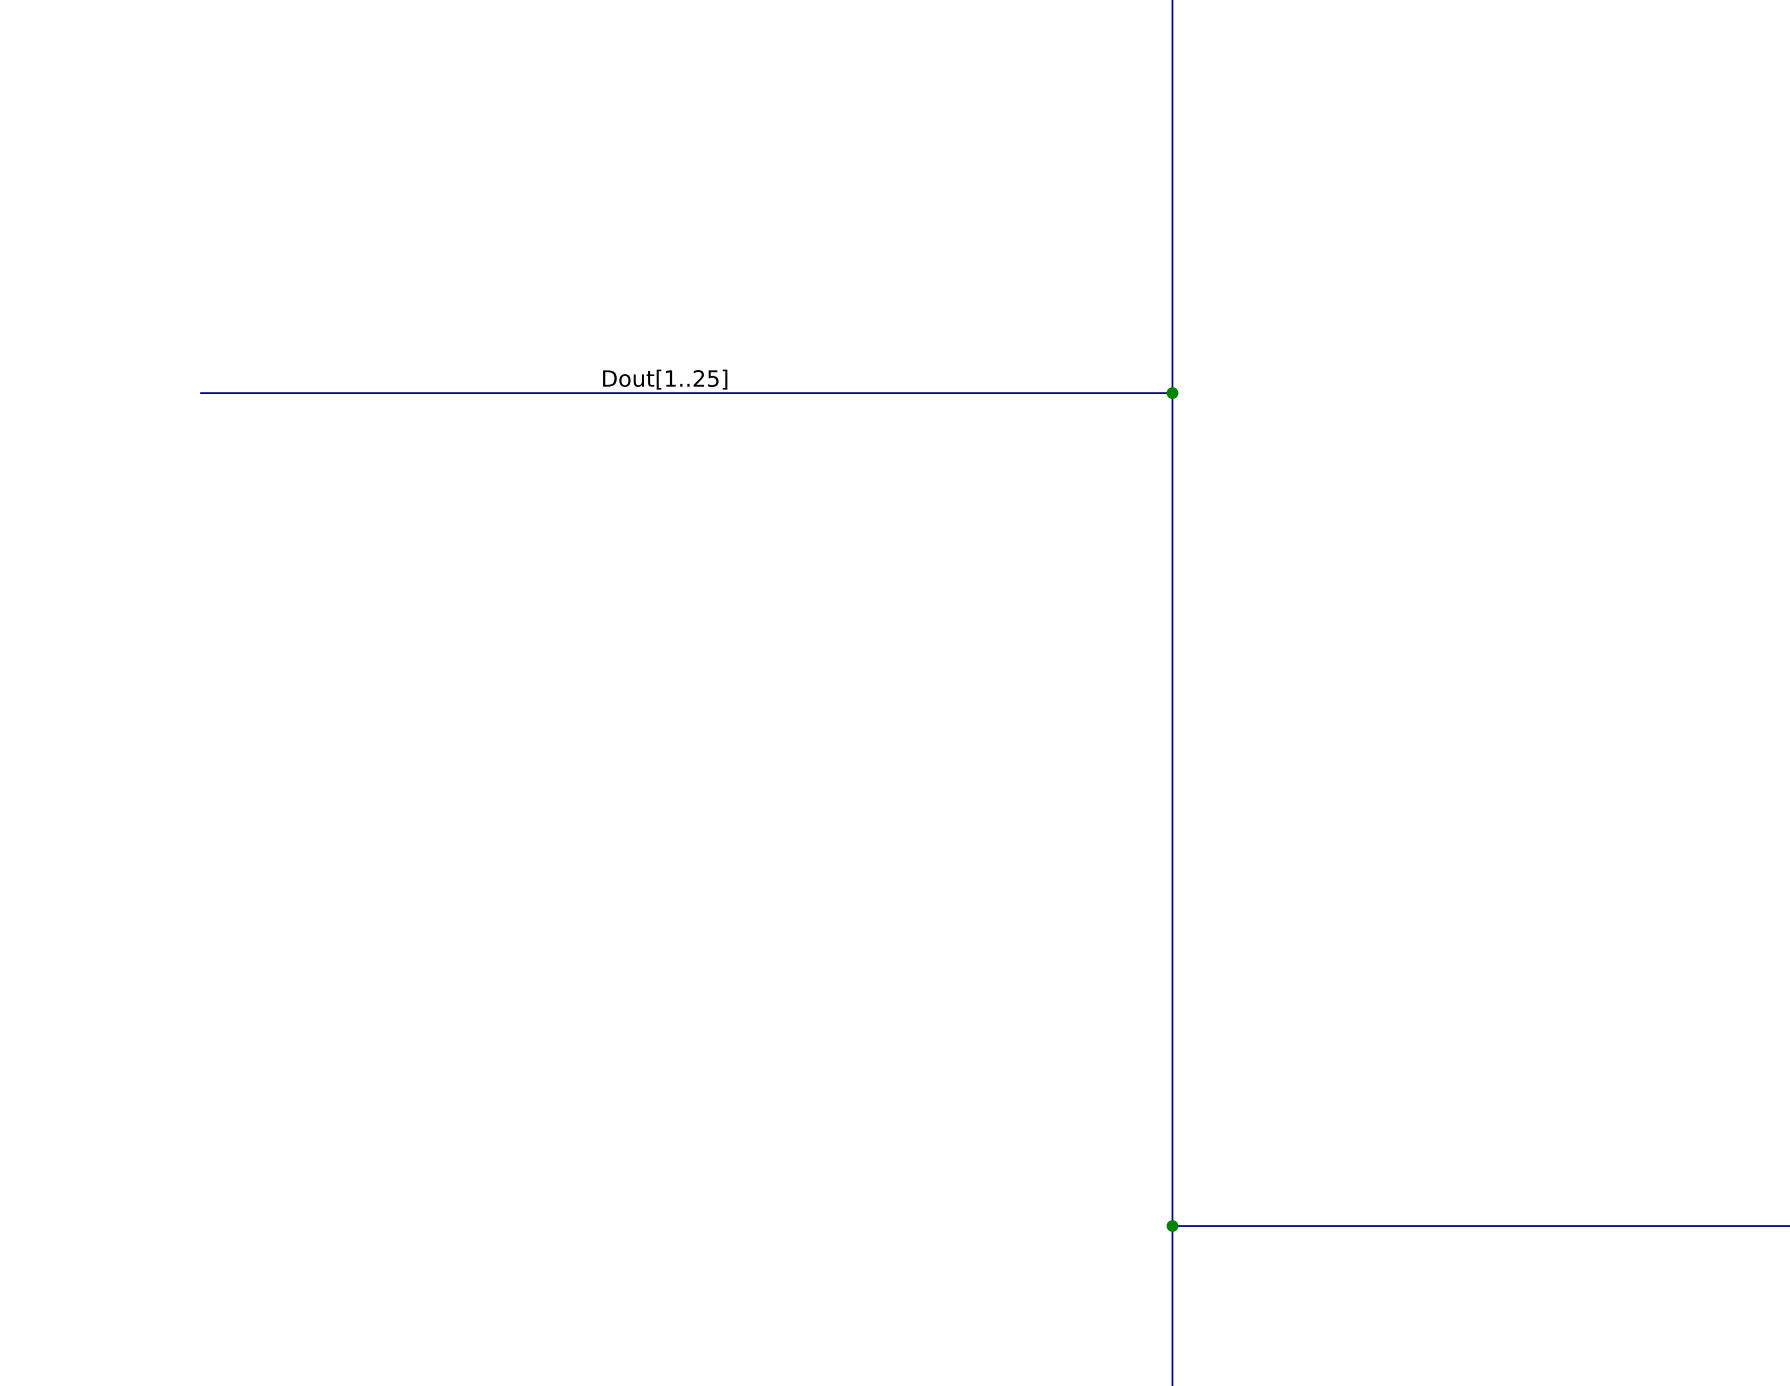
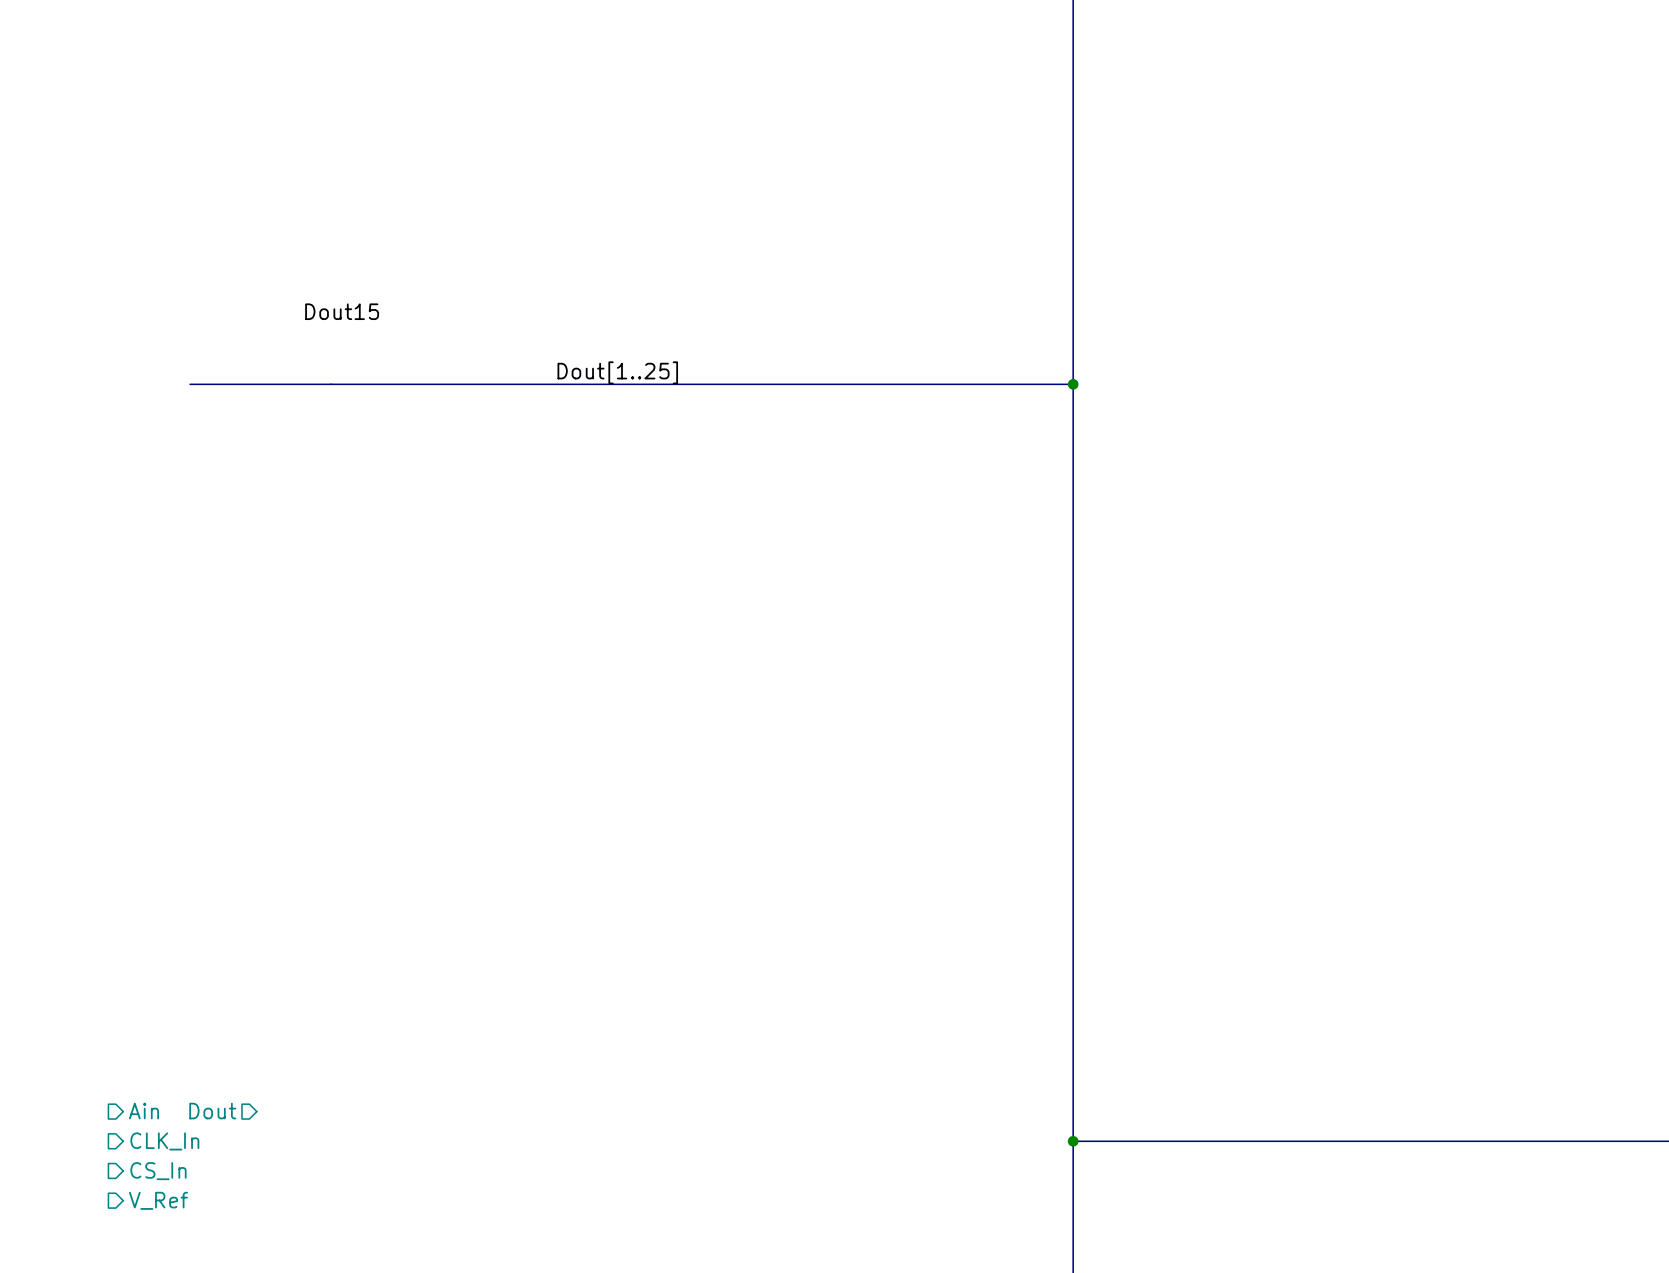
label: none -> Dout15 (342, 311)
sheet pin: none -> Ain (143, 1111)
sheet pin: none -> Dout (212, 1111)
sheet pin: none -> CLK_In (164, 1141)
sheet pin: none -> CS_In (158, 1171)
sheet pin: none -> V_Ref (158, 1200)

